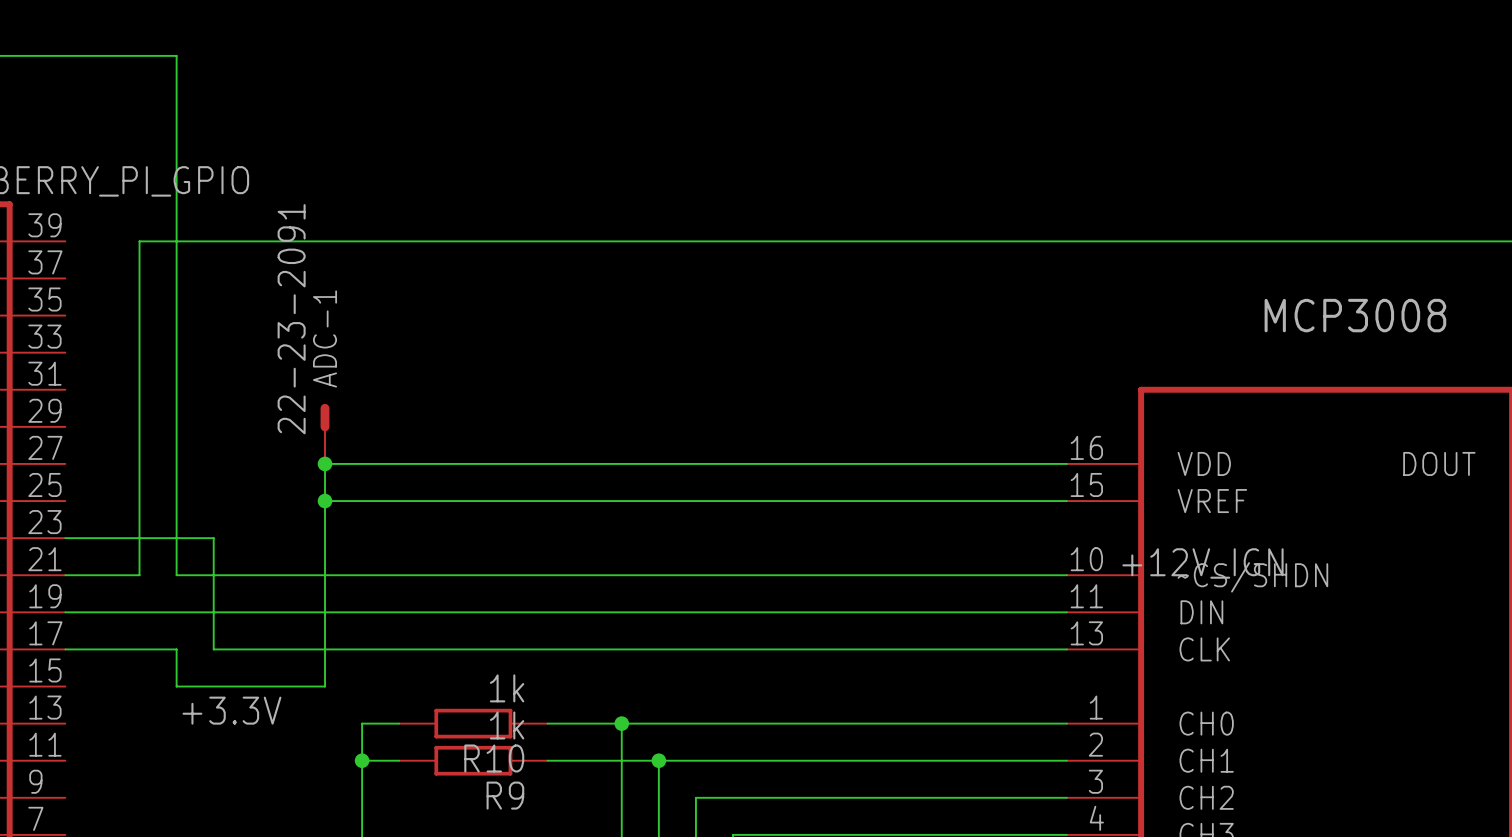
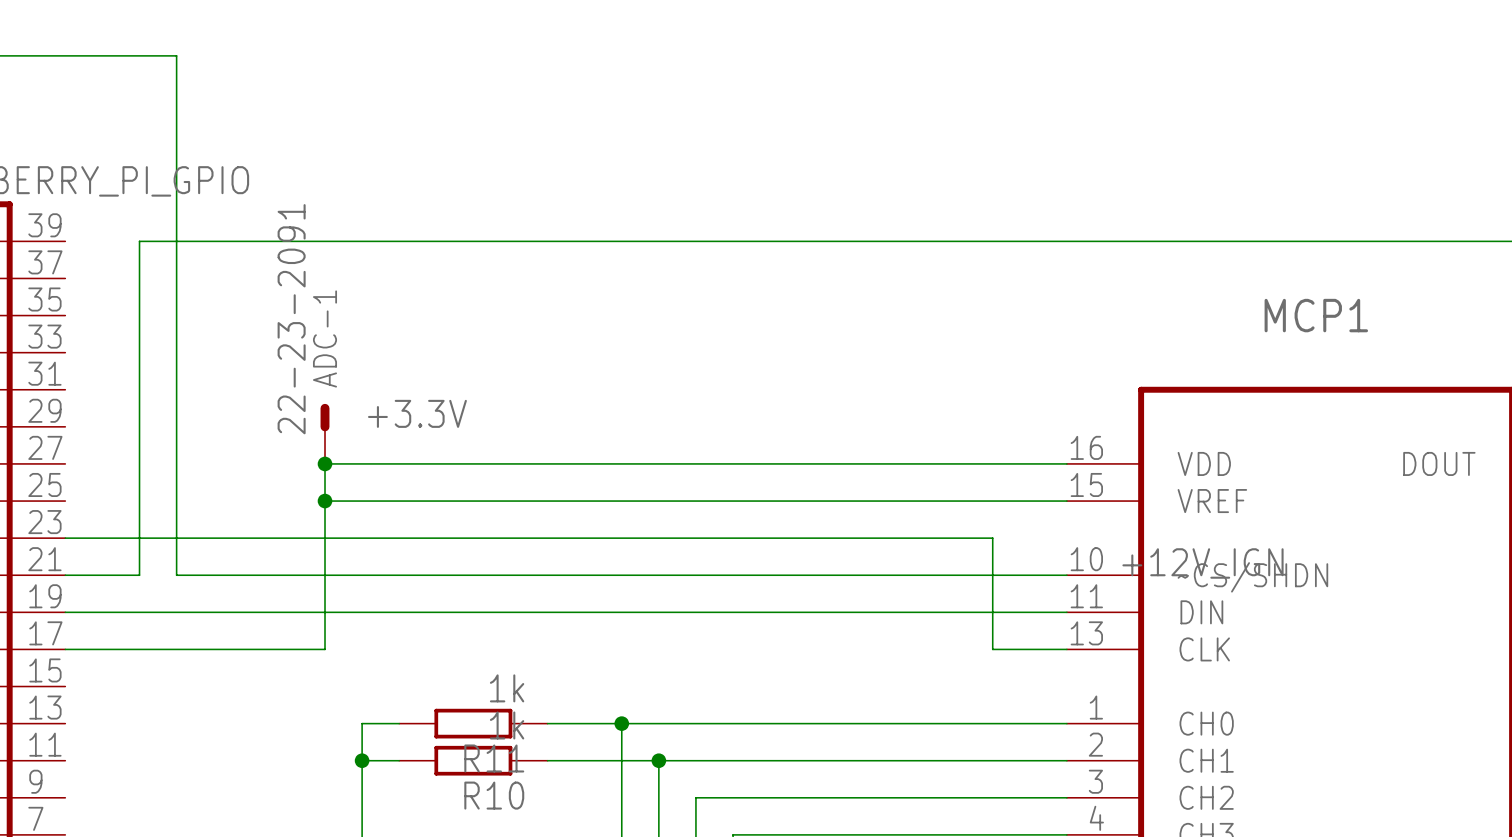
MCP3008 name: MCP3008 (1355, 315) -> MCP1 (1316, 315)
wire: (213, 538) (213, 649) -> (176, 649) (213, 649)
wire: (176, 649) (176, 686) (325, 686) (325, 649) (992, 649) -> (213, 538) (992, 538) (992, 649)
label position: +3.3V (231, 710) -> +3.3V (417, 413)
R10 name: R10 (494, 758) -> R11 (494, 758)
R9 name: R9 (505, 795) -> R10 (494, 795)

